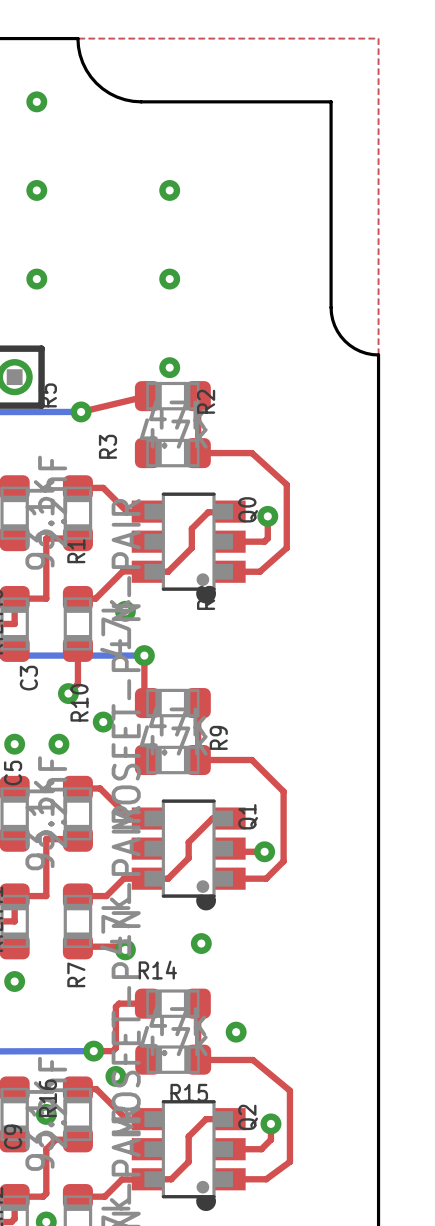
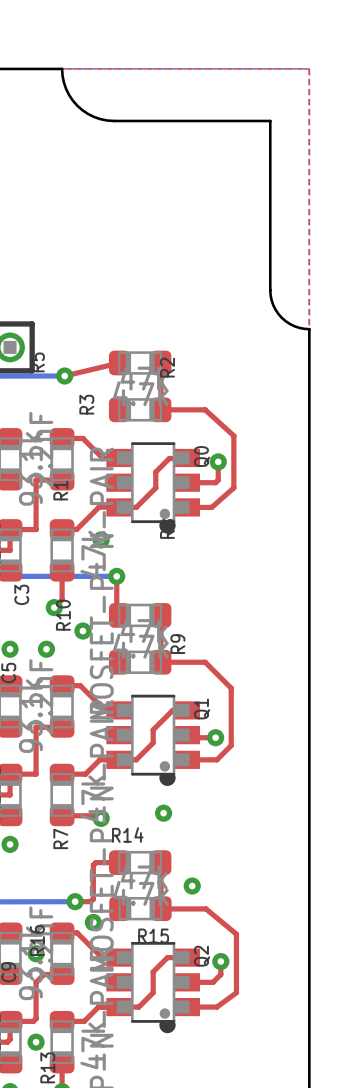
via: (36, 101) -> none
via: (36, 190) -> none
via: (169, 190) -> none
via: (36, 279) -> none
via: (169, 279) -> none
via: (169, 367) -> none

